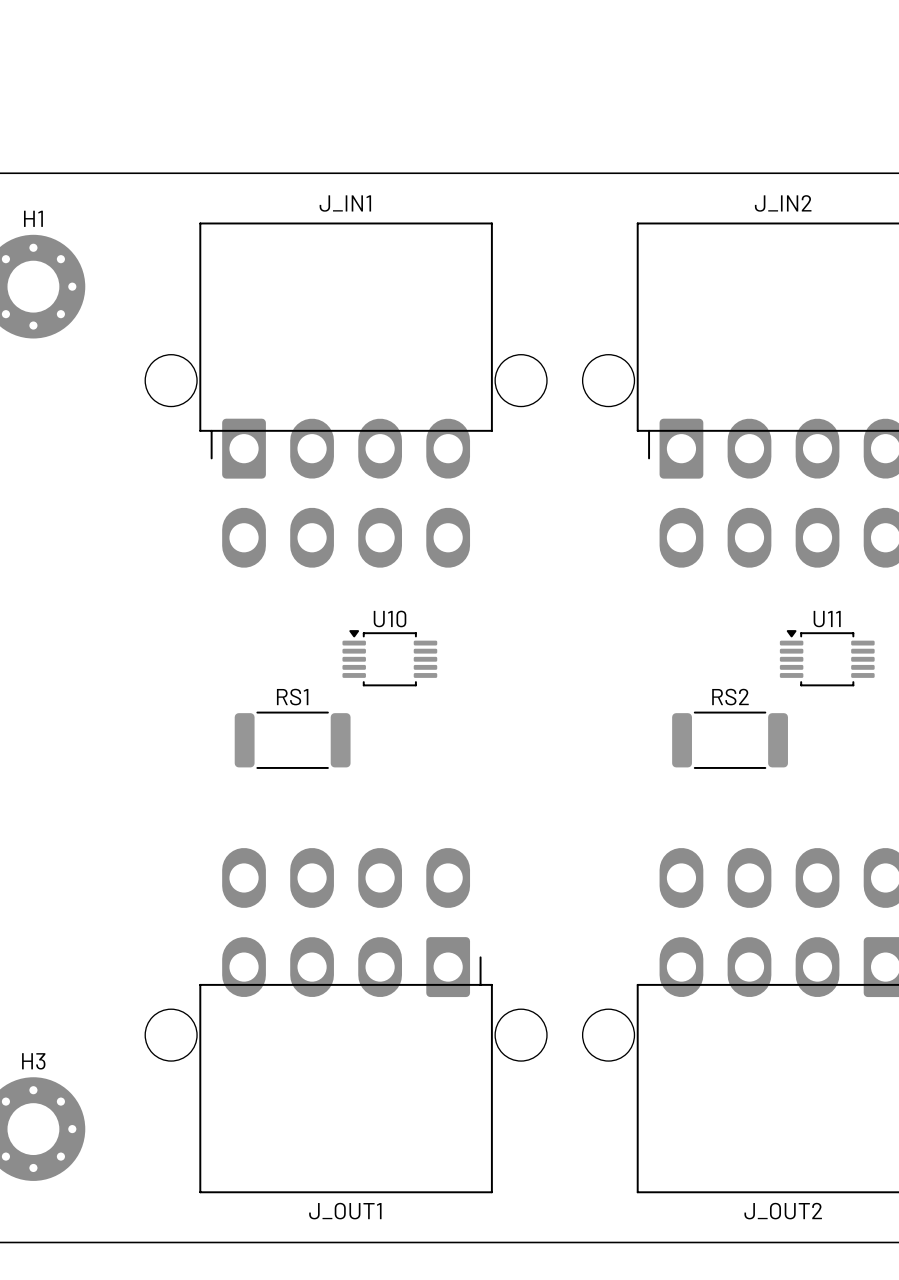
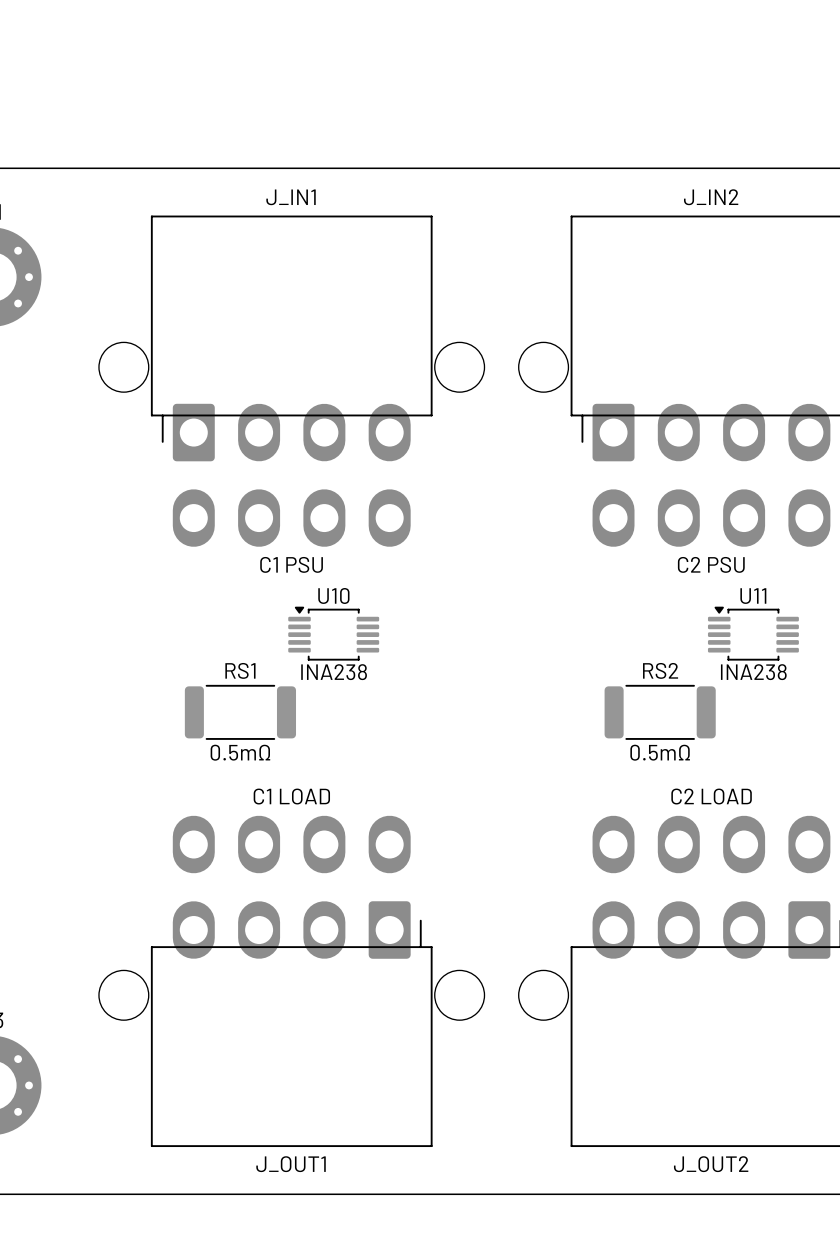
J_IN1 value: none -> C1 PSU (291, 564)
J_IN2 value: none -> C2 PSU (711, 564)
U10 value: none -> INA238 (334, 672)
U11 value: none -> INA238 (753, 672)
RS1 value: none -> 0.5mΩ (240, 752)
RS2 value: none -> 0.5mΩ (660, 752)
J_OUT1 value: none -> C1 LOAD (291, 796)
J_OUT2 value: none -> C2 LOAD (711, 796)

